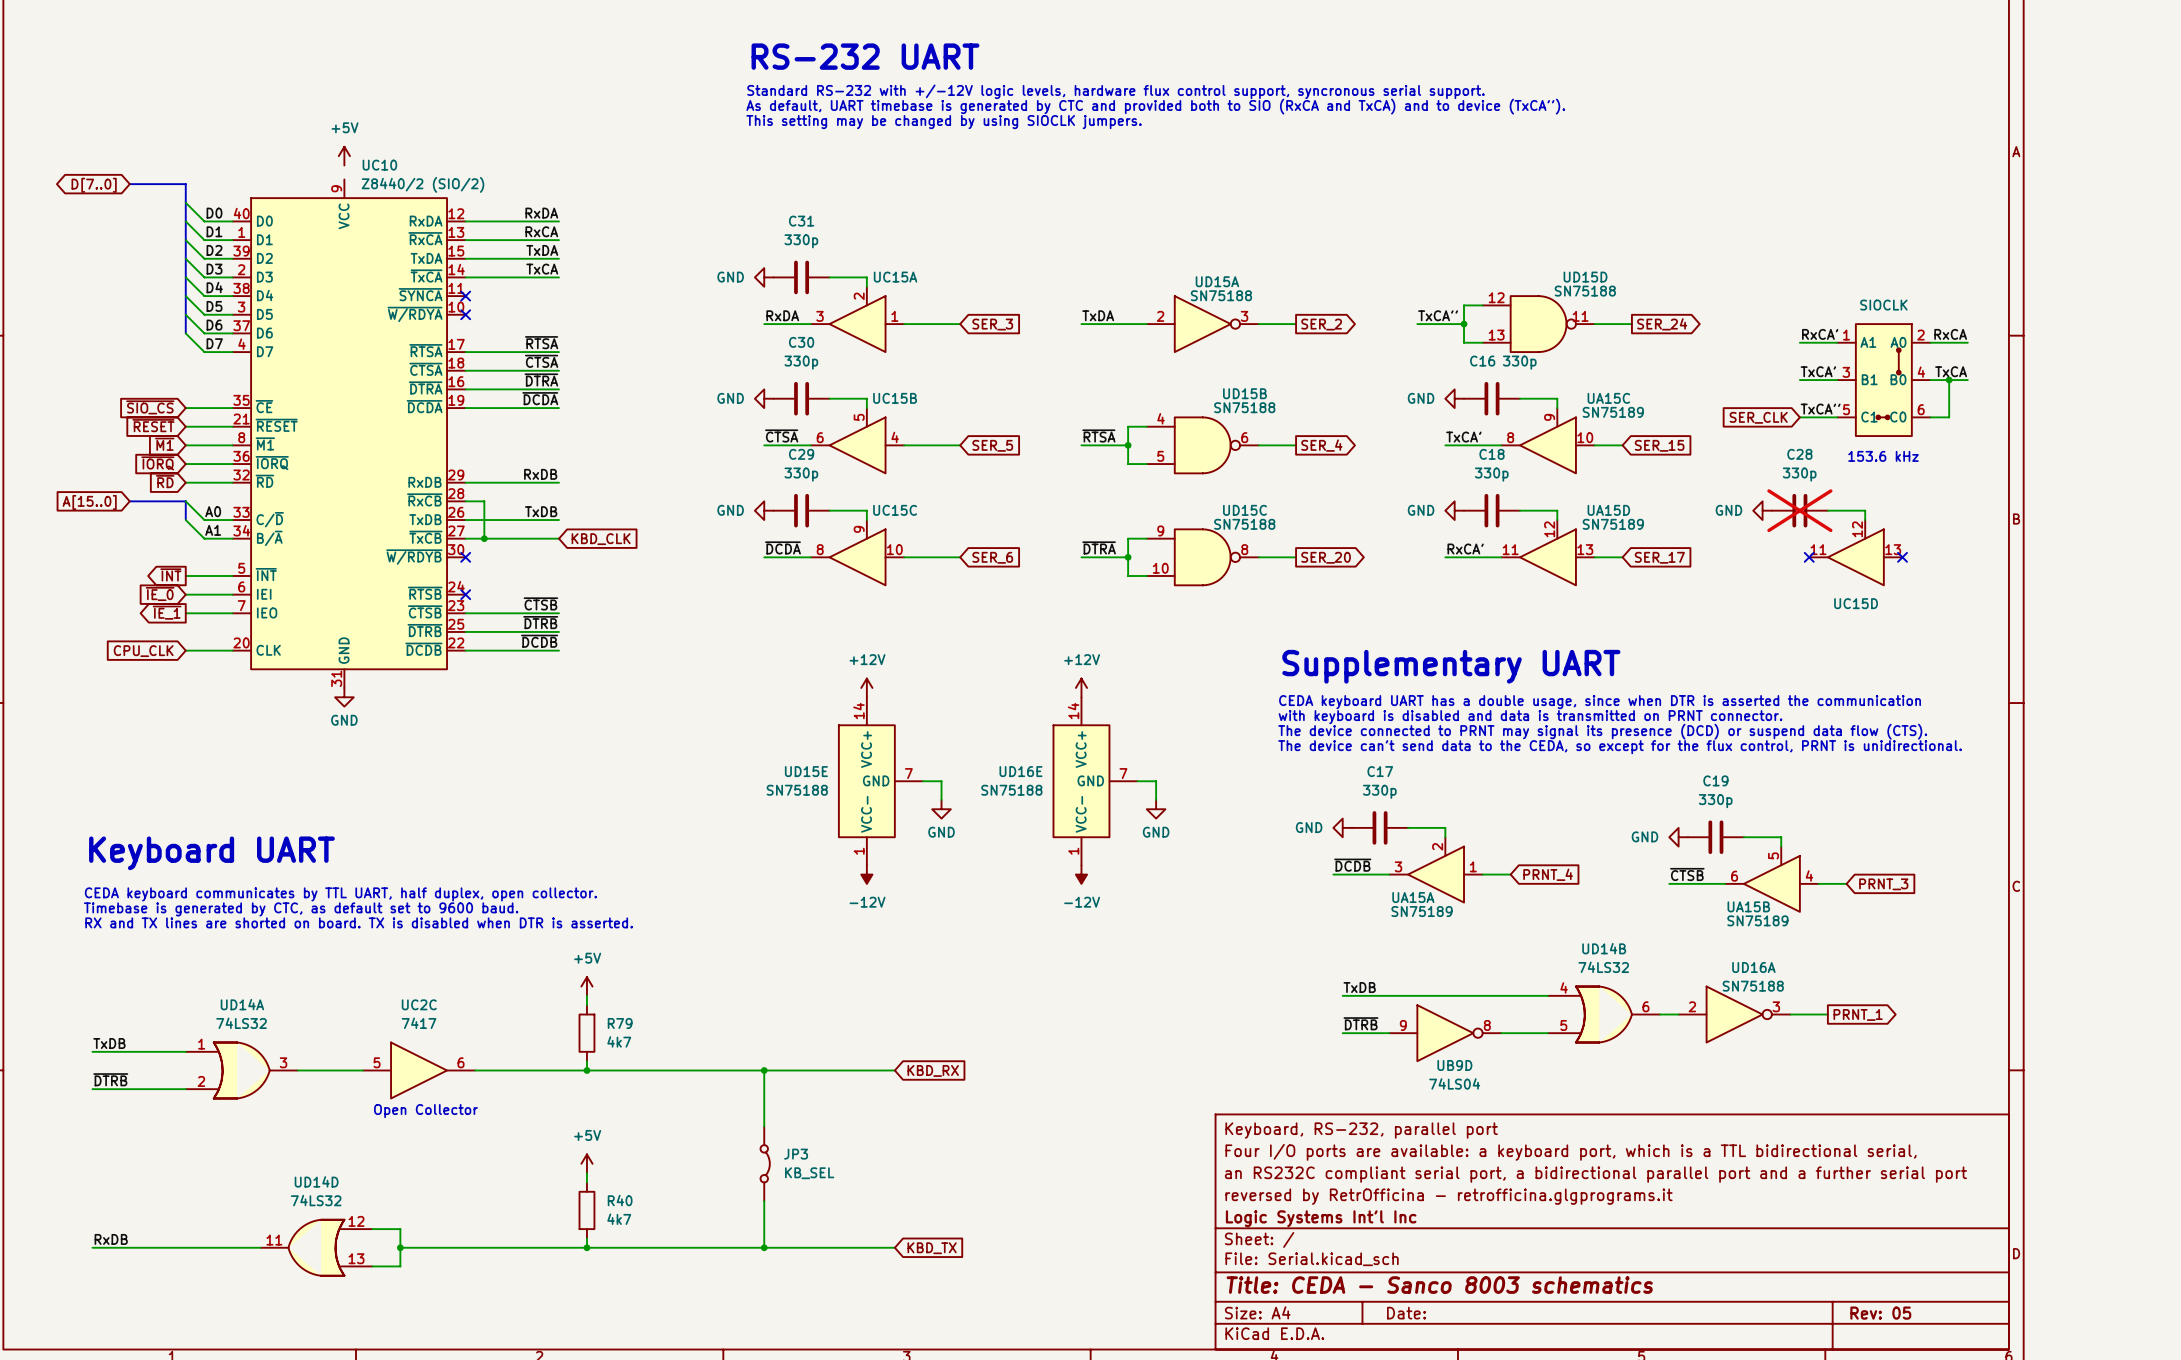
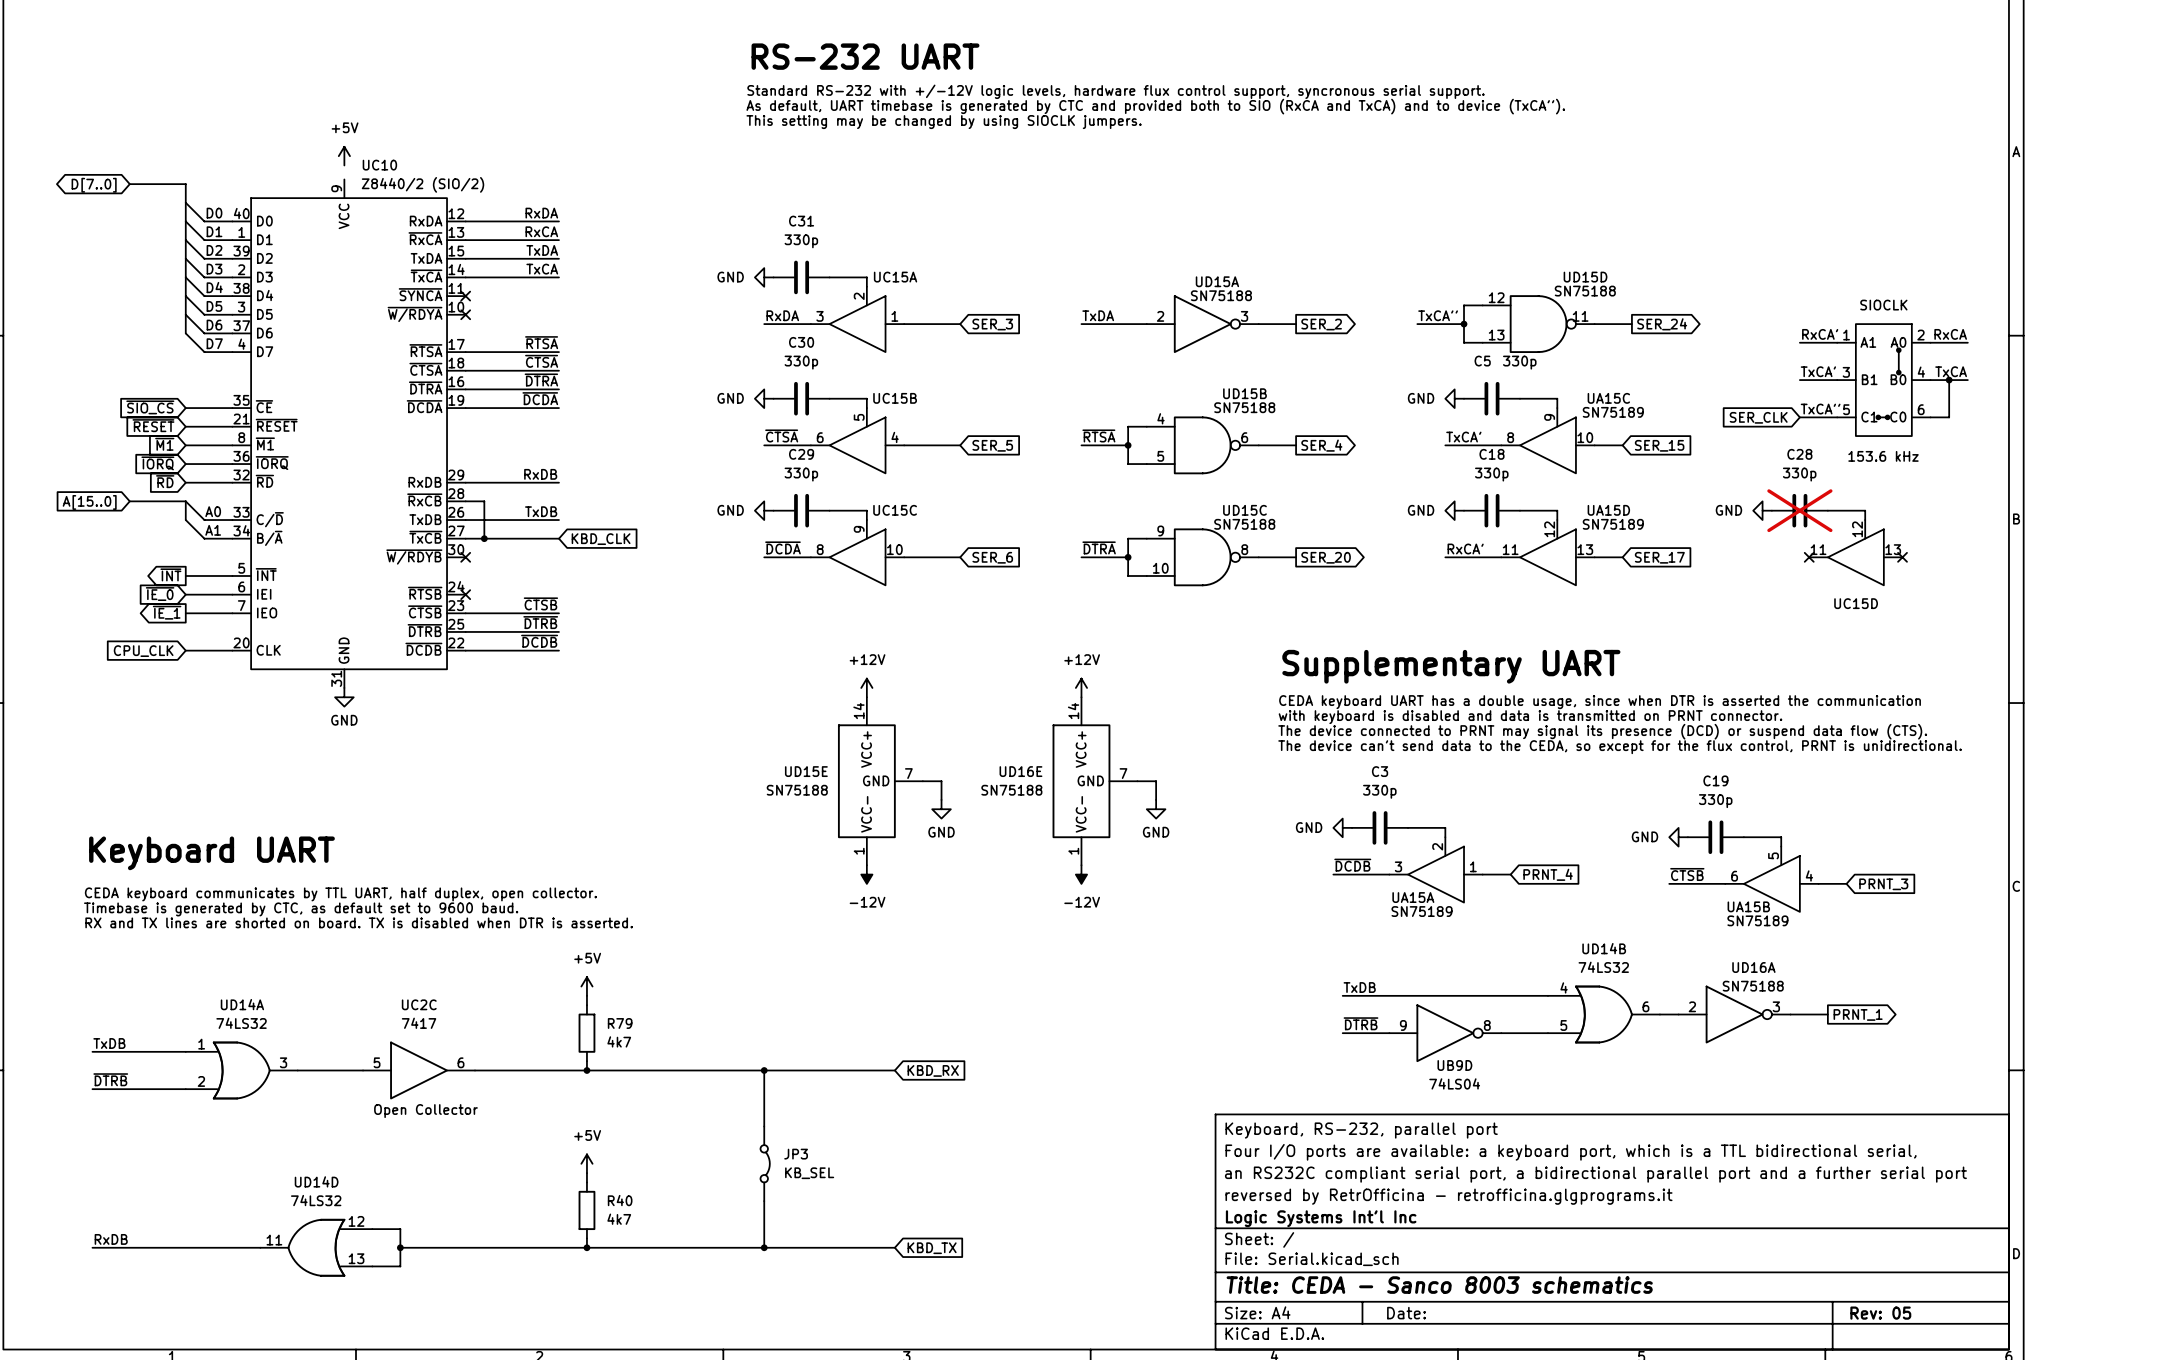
C16 name: C16 (1482, 361) -> C5 (1482, 361)
C17 name: C17 (1380, 771) -> C3 (1380, 771)

